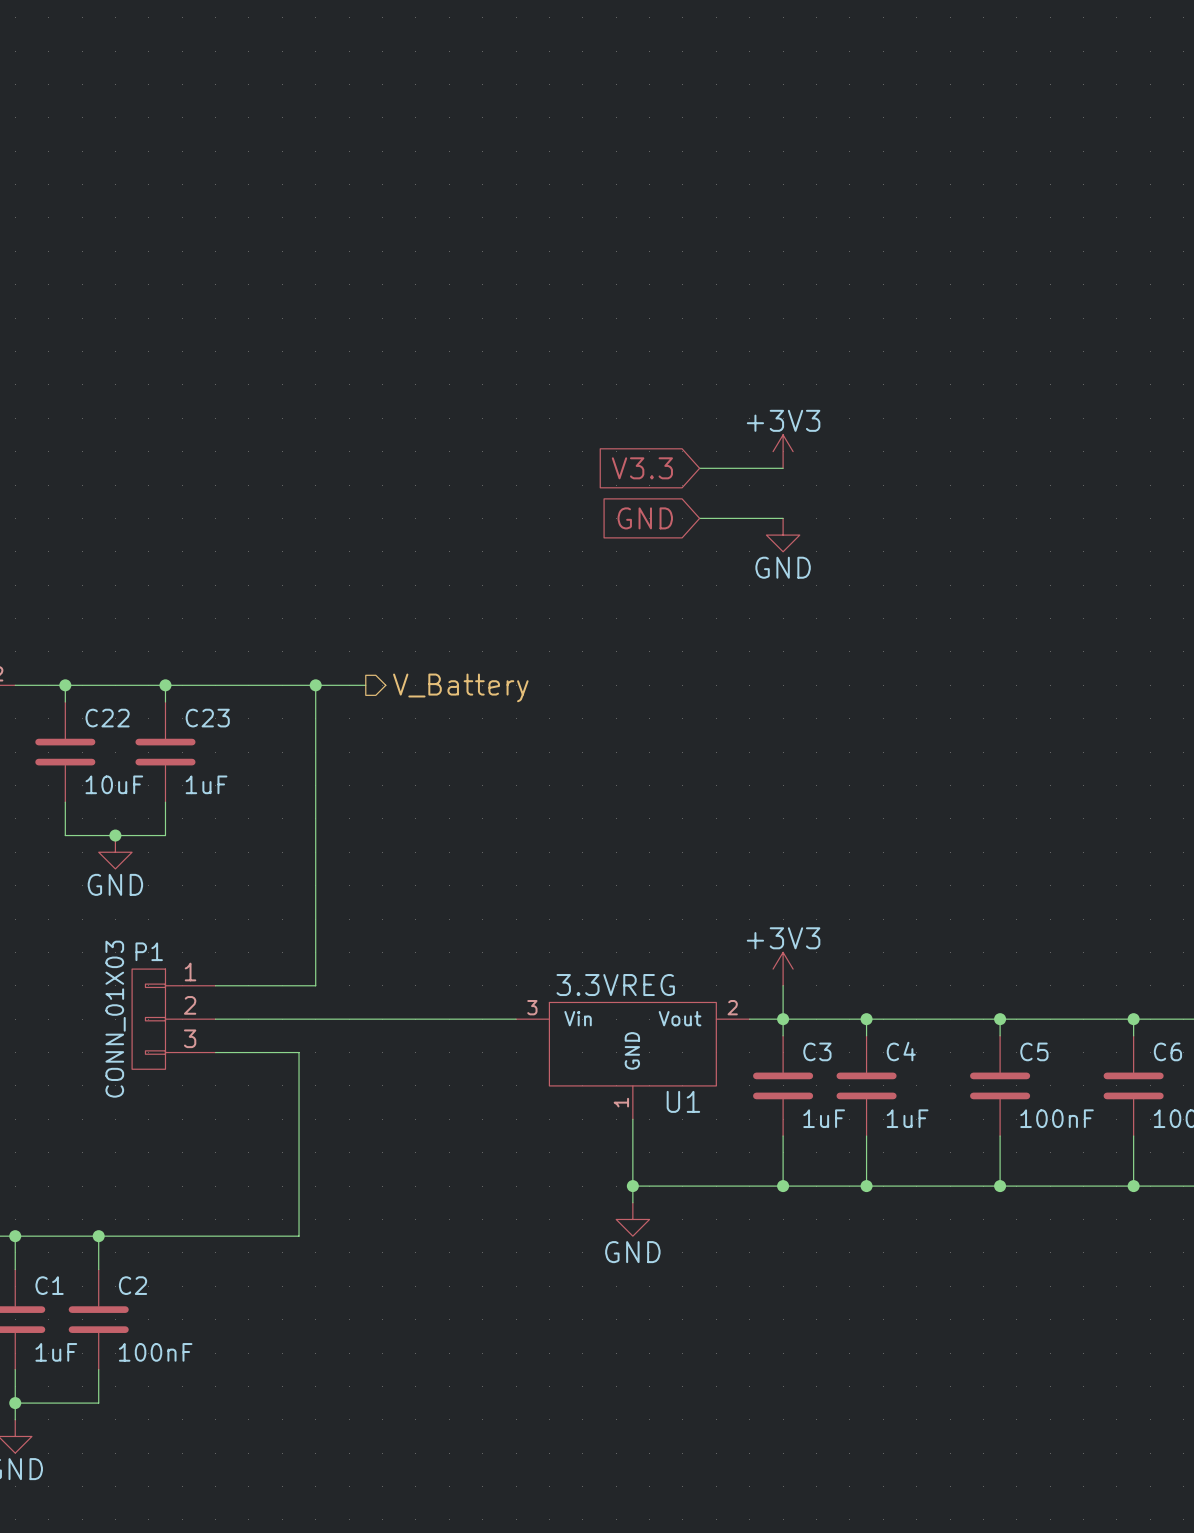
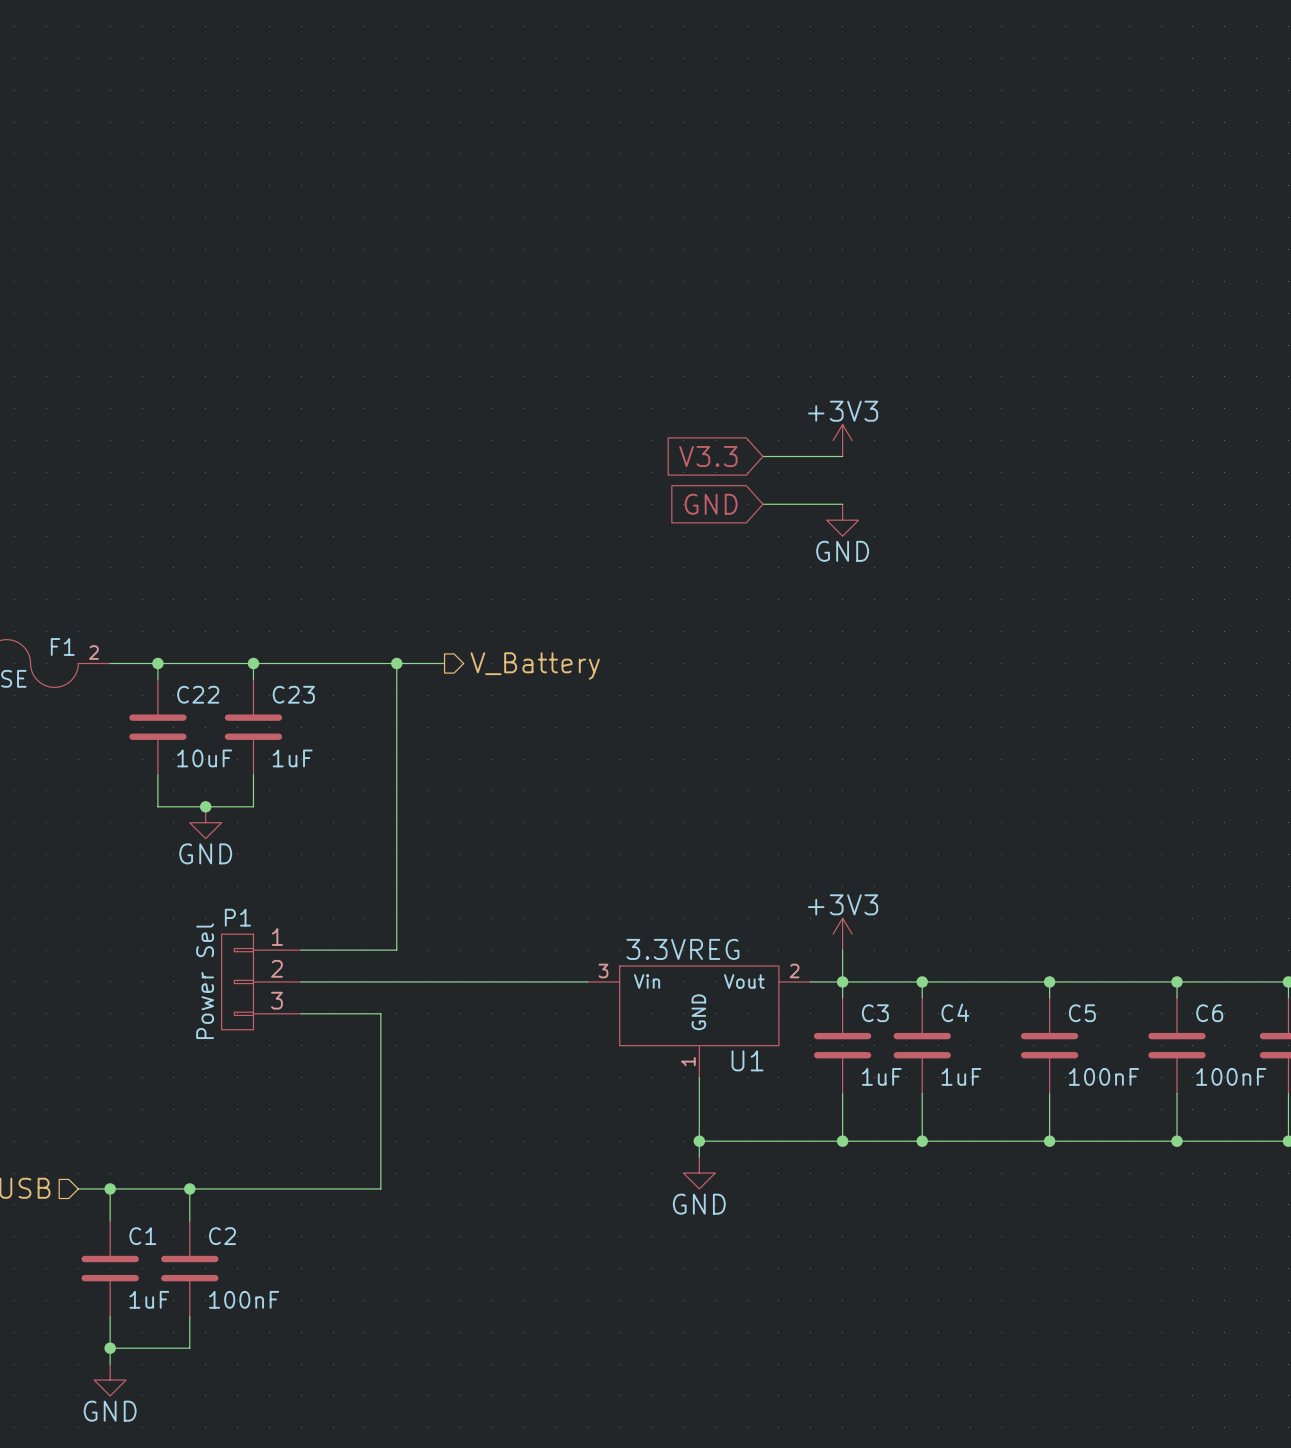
P1 value: CONN_01X03 (115, 1019) -> Power Sel (205, 981)

